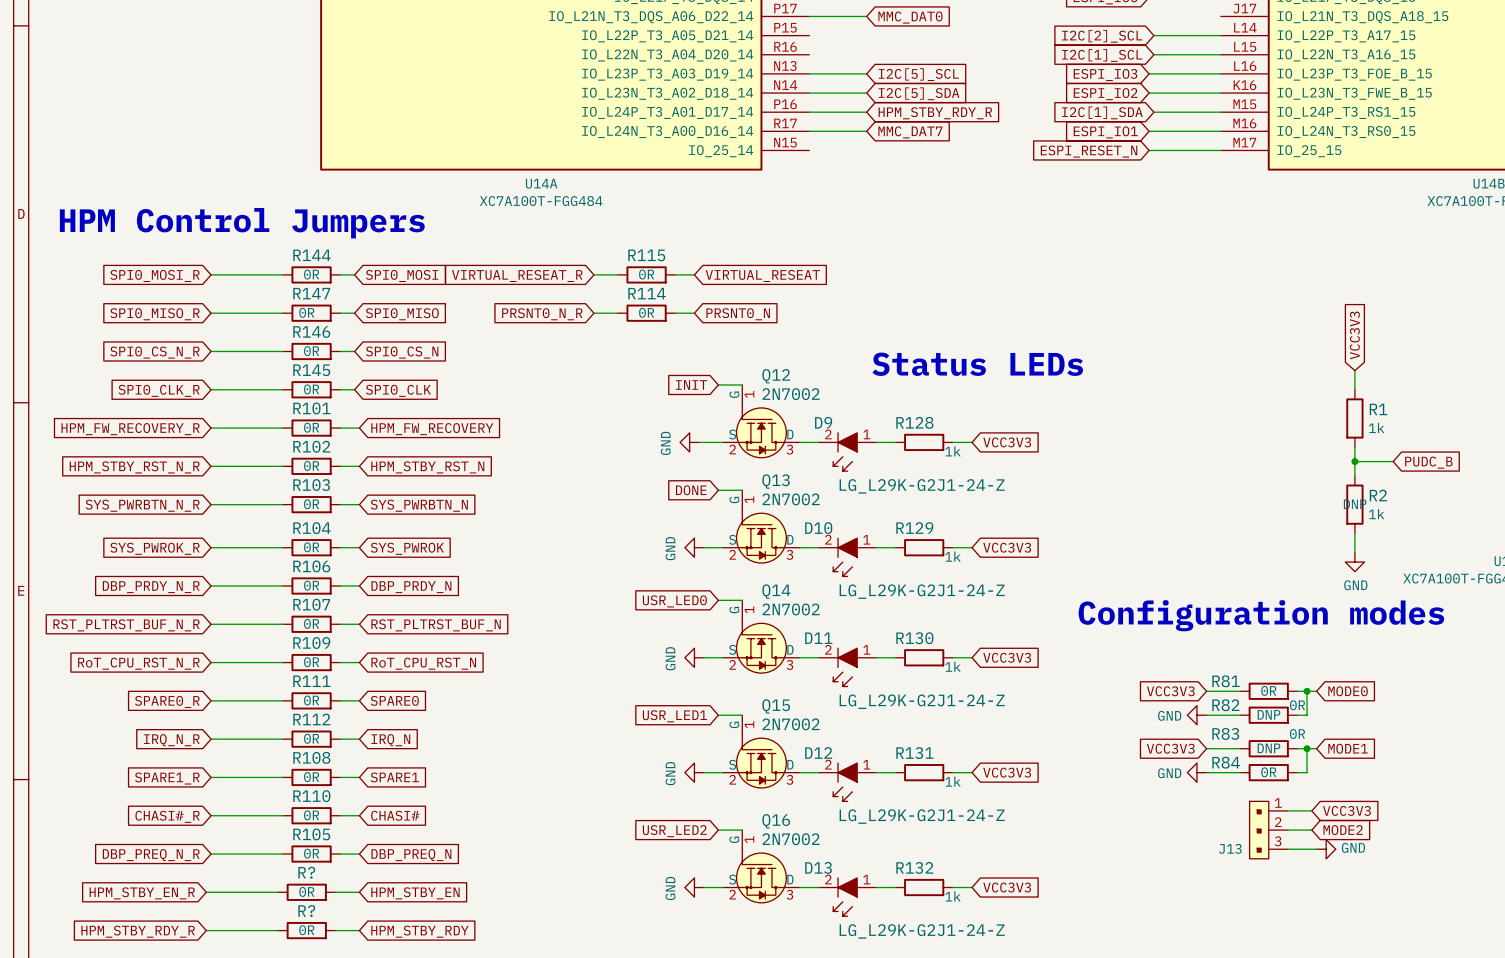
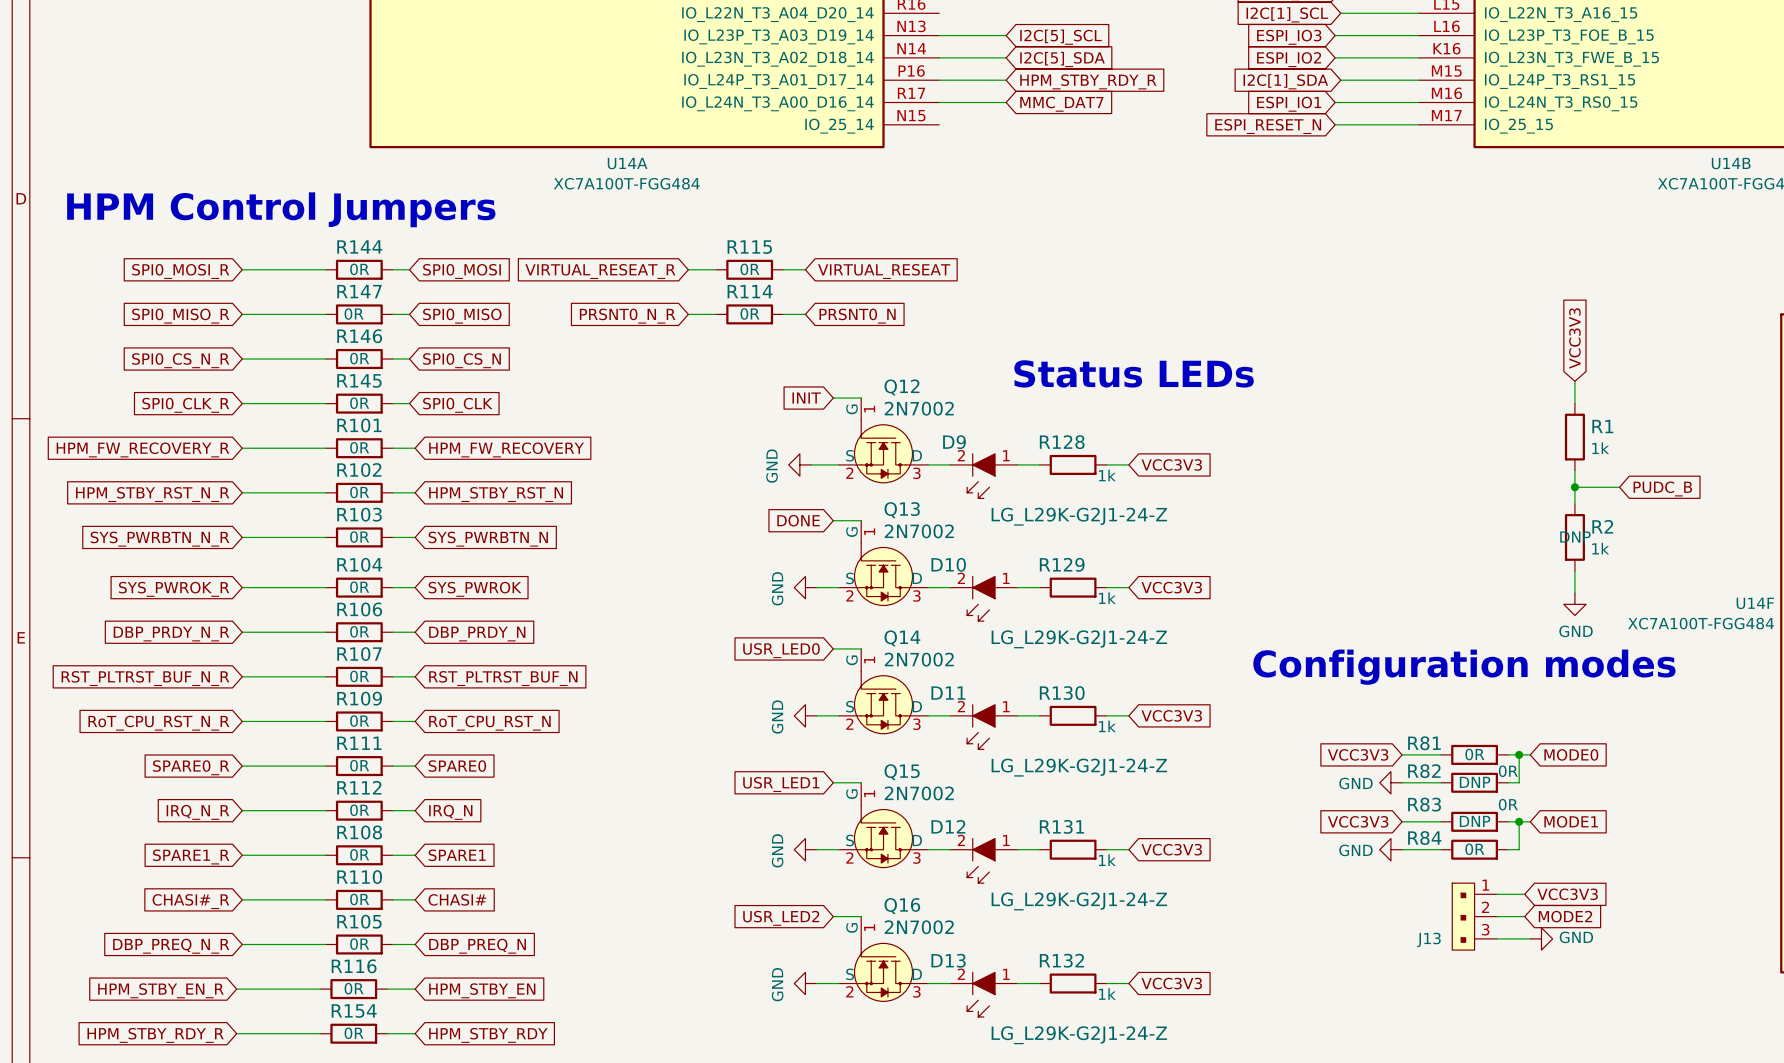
R? name: R? (306, 872) -> R116 (354, 966)
R? name: R? (306, 910) -> R154 (354, 1011)

